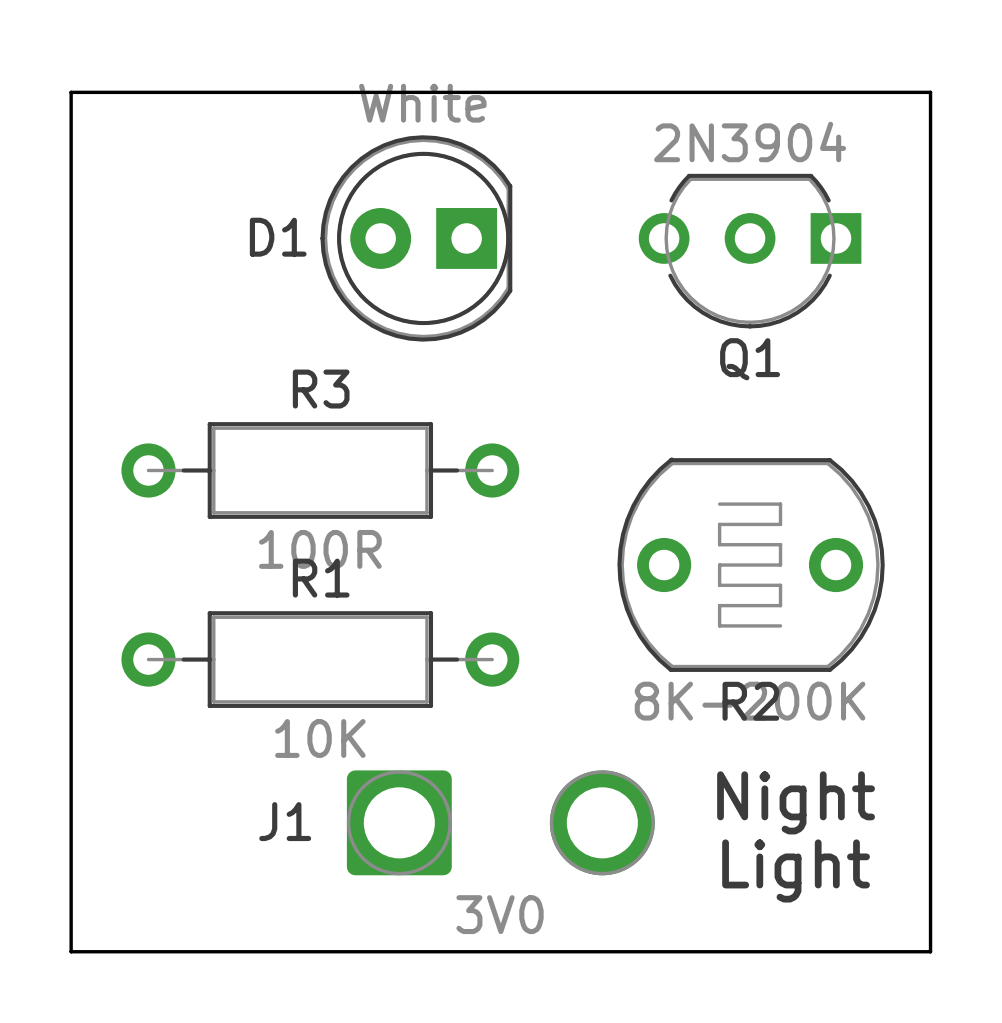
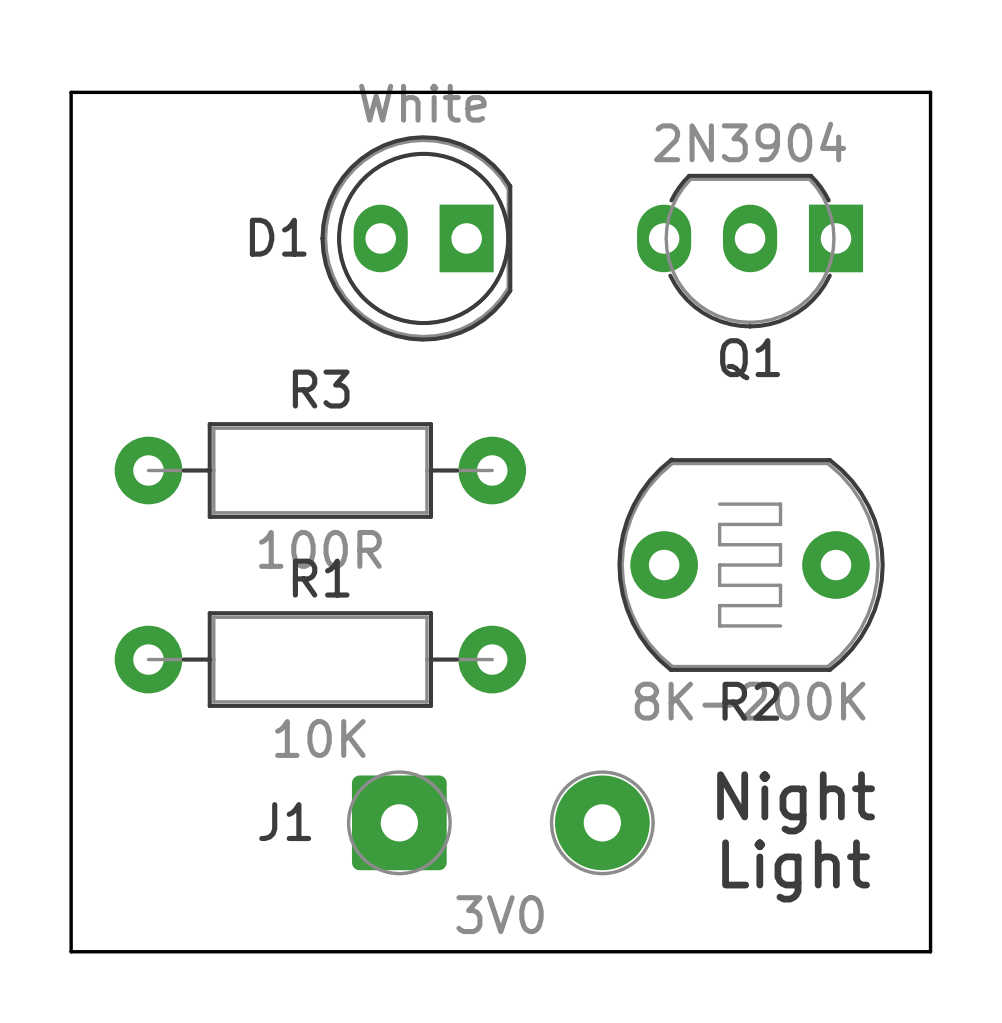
D1 footprint: [320, 135, 513, 342] -> [320, 135, 513, 342]
Q1 footprint: [638, 173, 862, 329] -> [637, 173, 864, 329]
R3 footprint: [121, 422, 520, 519] -> [114, 422, 527, 519]
R2 footprint: [617, 457, 885, 673] -> [617, 457, 885, 673]
R1 footprint: [121, 611, 520, 708] -> [114, 611, 527, 708]
J1 footprint: [346, 770, 655, 876] -> [346, 770, 655, 876]

